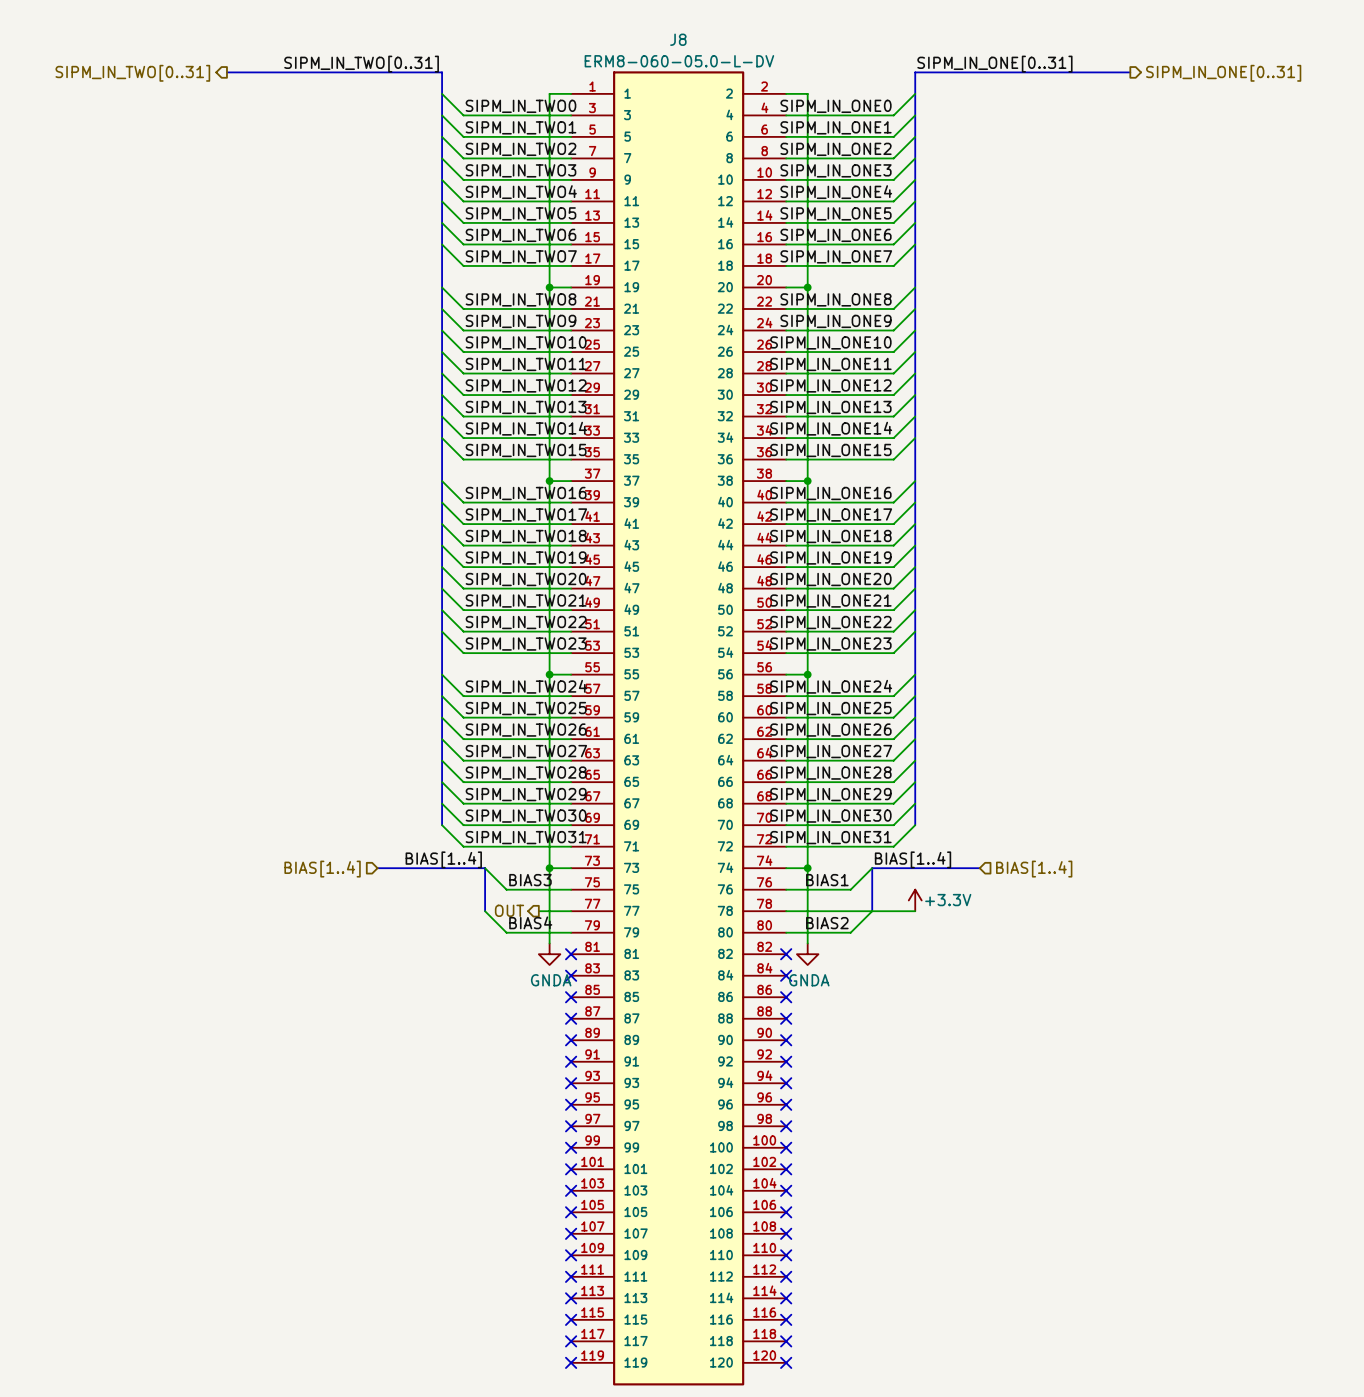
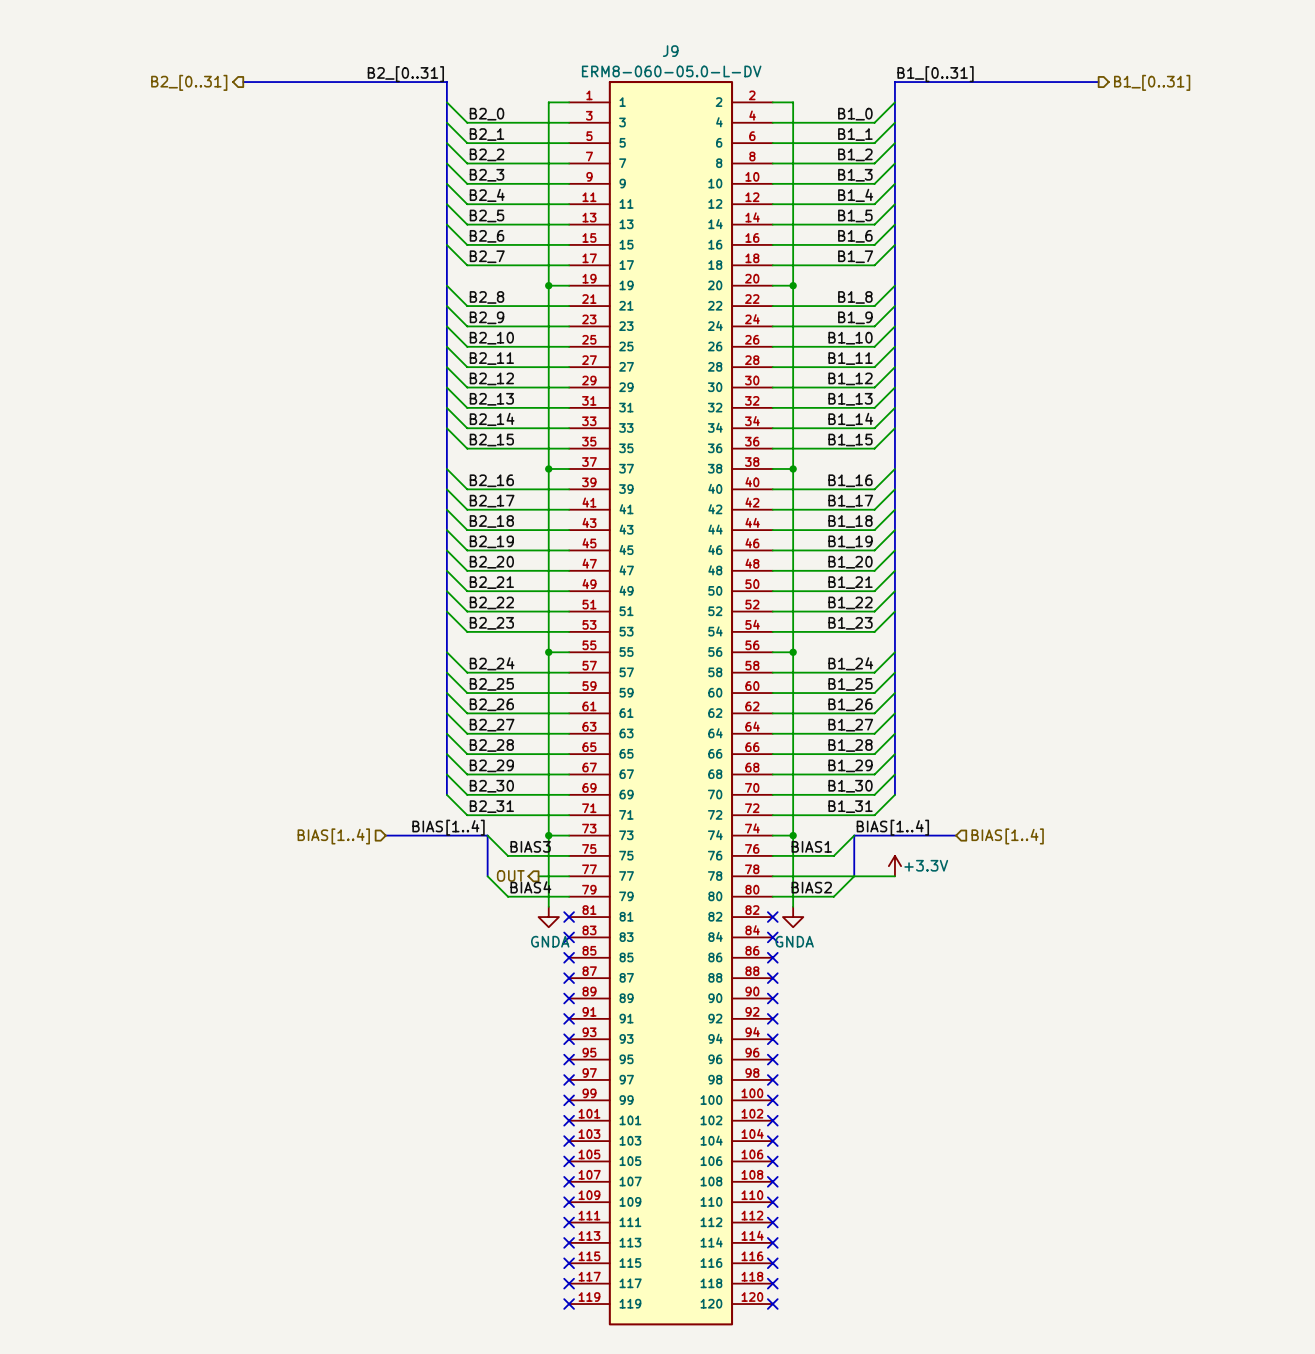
J8 name: J8 (678, 39) -> J9 (670, 51)
label: SIPM_IN_TWO[0..31] (361, 64) -> B2_[0..31] (405, 74)
label: SIPM_IN_ONE[0..31] (994, 64) -> B1_[0..31] (935, 74)
hierarchical label: SIPM_IN_TWO[0..31] (132, 73) -> B2_[0..31] (189, 82)
hierarchical label: SIPM_IN_ONE[0..31] (1223, 73) -> B1_[0..31] (1152, 82)
label: SIPM_IN_TWO0 (521, 106) -> B2_0 (486, 114)
label: SIPM_IN_ONE0 (836, 106) -> B1_0 (855, 114)
label: SIPM_IN_TWO1 (521, 127) -> B2_1 (486, 134)
label: SIPM_IN_ONE1 (836, 127) -> B1_1 (855, 134)
label: SIPM_IN_TWO2 (521, 149) -> B2_2 (486, 154)
label: SIPM_IN_ONE2 (836, 149) -> B1_2 (855, 154)
label: SIPM_IN_TWO3 (521, 170) -> B2_3 (486, 175)
label: SIPM_IN_ONE3 (836, 170) -> B1_3 (855, 175)
label: SIPM_IN_TWO4 (521, 192) -> B2_4 (487, 195)
label: SIPM_IN_ONE4 (836, 192) -> B1_4 (855, 195)
label: SIPM_IN_TWO5 (521, 213) -> B2_5 (486, 215)
label: SIPM_IN_ONE5 (836, 213) -> B1_5 (855, 215)
label: SIPM_IN_TWO6 (521, 235) -> B2_6 (486, 236)
label: SIPM_IN_ONE6 (836, 235) -> B1_6 (855, 236)
label: SIPM_IN_TWO7 (521, 256) -> B2_7 (487, 256)
label: SIPM_IN_ONE7 (836, 256) -> B1_7 (855, 256)
label: SIPM_IN_TWO8 (521, 299) -> B2_8 (486, 297)
label: SIPM_IN_ONE8 (836, 299) -> B1_8 (855, 297)
label: SIPM_IN_TWO9 (521, 321) -> B2_9 (486, 317)
label: SIPM_IN_ONE9 (836, 321) -> B1_9 (855, 317)
label: SIPM_IN_TWO10 (526, 342) -> B2_10 (491, 338)
label: SIPM_IN_ONE10 (830, 342) -> B1_10 (850, 338)
label: SIPM_IN_TWO11 (526, 364) -> B2_11 (491, 358)
label: SIPM_IN_ONE11 (830, 364) -> B1_11 (850, 358)
label: SIPM_IN_TWO12 (526, 385) -> B2_12 (491, 378)
label: SIPM_IN_ONE12 (830, 385) -> B1_12 (850, 378)
label: SIPM_IN_TWO13 (526, 407) -> B2_13 (491, 399)
label: SIPM_IN_ONE13 (830, 407) -> B1_13 (850, 399)
label: SIPM_IN_TWO14 (526, 428) -> B2_14 (492, 419)
label: SIPM_IN_ONE14 (831, 428) -> B1_14 (850, 419)
label: SIPM_IN_TWO15 (526, 450) -> B2_15 (491, 440)
label: SIPM_IN_ONE15 (830, 450) -> B1_15 (850, 440)
label: SIPM_IN_TWO16 (526, 493) -> B2_16 (491, 480)
label: SIPM_IN_ONE16 (830, 493) -> B1_16 (850, 480)
label: SIPM_IN_TWO17 (526, 514) -> B2_17 (492, 501)
label: SIPM_IN_ONE17 (831, 514) -> B1_17 (850, 501)
label: SIPM_IN_TWO18 (526, 536) -> B2_18 (491, 521)
label: SIPM_IN_ONE18 (830, 536) -> B1_18 (850, 521)
label: SIPM_IN_TWO19 (526, 558) -> B2_19 (491, 541)
label: SIPM_IN_ONE19 (830, 558) -> B1_19 (850, 541)
label: SIPM_IN_TWO20 (526, 579) -> B2_20 (491, 562)
label: SIPM_IN_ONE20 (830, 579) -> B1_20 (850, 562)
label: SIPM_IN_TWO21 (526, 601) -> B2_21 (491, 582)
label: SIPM_IN_ONE21 (830, 601) -> B1_21 (850, 582)
label: SIPM_IN_TWO22 (526, 622) -> B2_22 (491, 602)
label: SIPM_IN_ONE22 (830, 622) -> B1_22 (850, 602)
label: SIPM_IN_TWO23 (526, 644) -> B2_23 (491, 623)
label: SIPM_IN_ONE23 (830, 644) -> B1_23 (850, 623)
label: SIPM_IN_TWO24 (526, 686) -> B2_24 (492, 663)
label: SIPM_IN_ONE24 (831, 686) -> B1_24 (850, 663)
label: SIPM_IN_TWO25 (526, 708) -> B2_25 (491, 684)
label: SIPM_IN_ONE25 (830, 708) -> B1_25 (850, 684)
label: SIPM_IN_TWO26 (526, 730) -> B2_26 (491, 704)
label: SIPM_IN_ONE26 (830, 730) -> B1_26 (850, 704)
label: SIPM_IN_TWO27 (526, 751) -> B2_27 (492, 725)
label: SIPM_IN_ONE27 (831, 751) -> B1_27 (850, 725)
label: SIPM_IN_TWO28 (526, 773) -> B2_28 (491, 745)
label: SIPM_IN_ONE28 (830, 773) -> B1_28 (850, 745)
label: SIPM_IN_TWO29 (526, 794) -> B2_29 (491, 765)
label: SIPM_IN_ONE29 (830, 794) -> B1_29 (850, 765)
label: SIPM_IN_TWO30 (526, 816) -> B2_30 (491, 786)
label: SIPM_IN_ONE30 (830, 816) -> B1_30 (850, 786)
label: SIPM_IN_TWO31 (526, 837) -> B2_31 (491, 806)
label: SIPM_IN_ONE31 (830, 837) -> B1_31 (850, 806)

